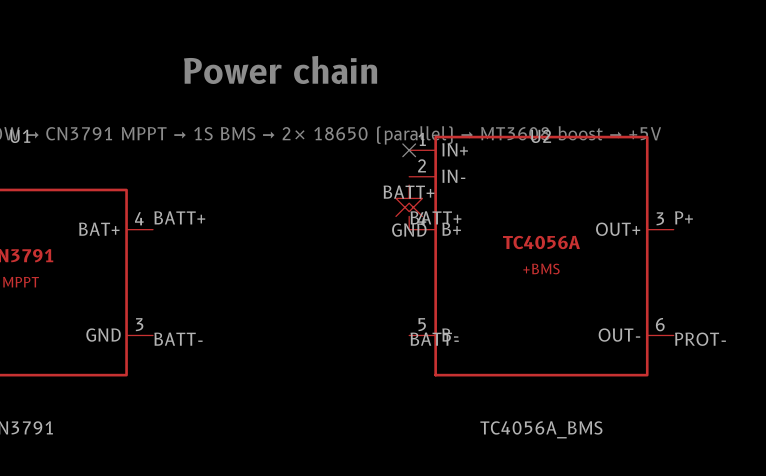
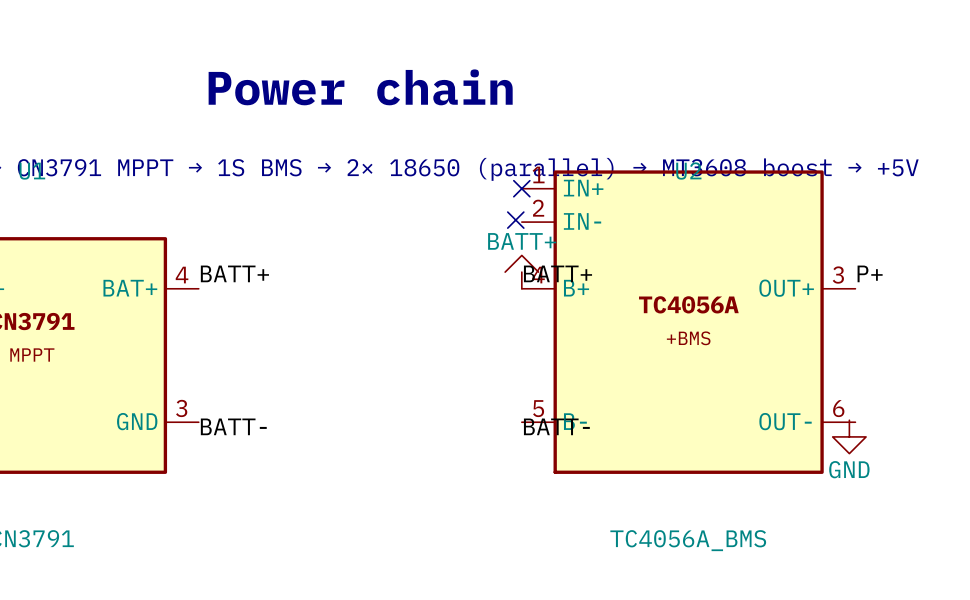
no-connect mark: none -> (515, 220)
power symbol: GND (409, 198) -> none
label: PROT- (700, 339) -> none
power symbol: none -> GND (849, 436)

